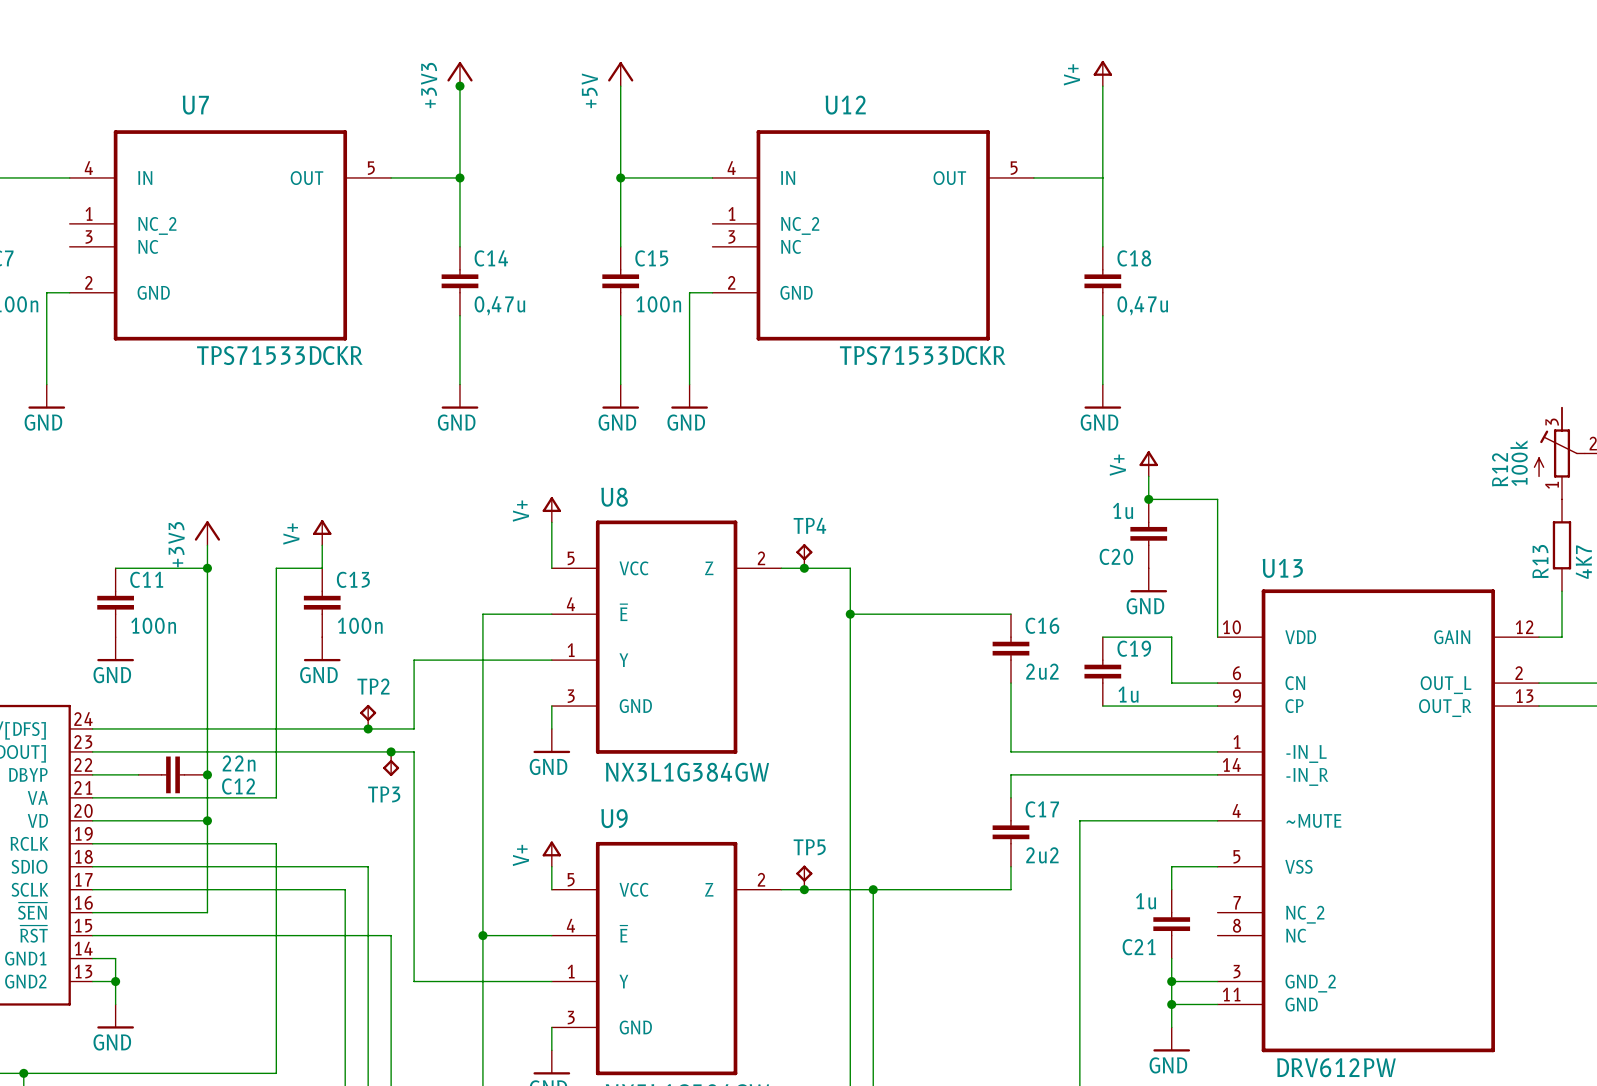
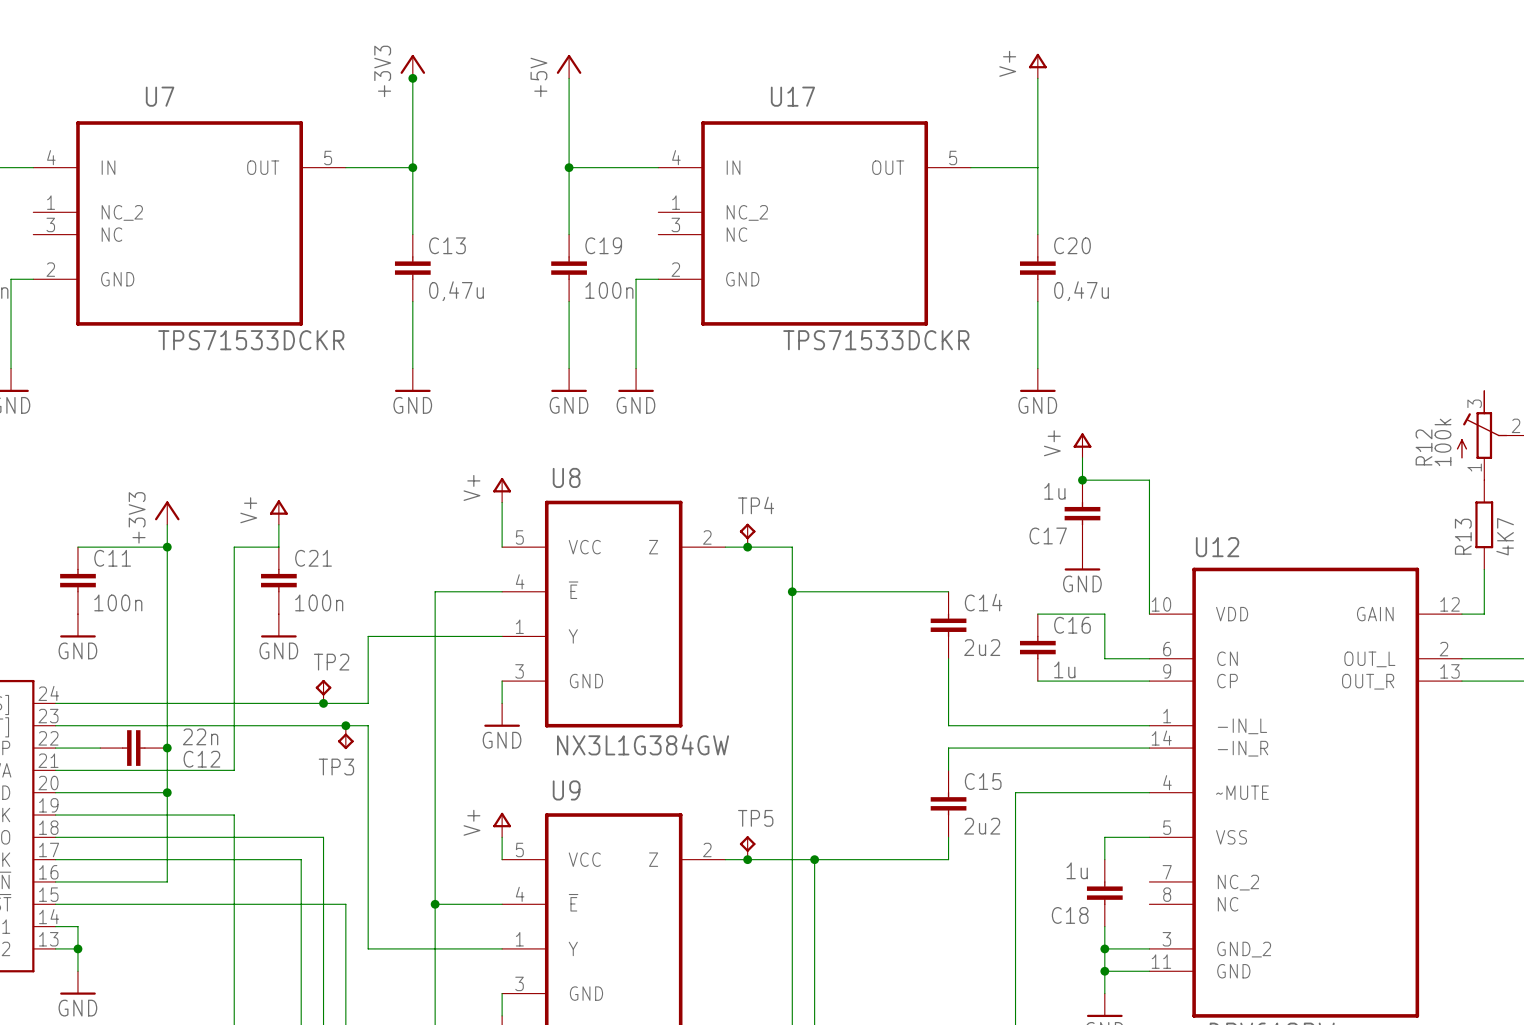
U12 name: U12 (845, 105) -> U17 (792, 96)
C14 name: C14 (491, 258) -> C13 (447, 245)
C15 name: C15 (651, 258) -> C19 (603, 245)
C18 name: C18 (1134, 258) -> C20 (1072, 245)
C20 name: C20 (1116, 556) -> C17 (1048, 535)
U13 name: U13 (1282, 568) -> U12 (1217, 547)
C13 name: C13 (353, 579) -> C21 (313, 558)
C16 name: C16 (1042, 625) -> C14 (983, 602)
C19 name: C19 (1134, 648) -> C16 (1072, 625)
C17 name: C17 (1042, 809) -> C15 (983, 781)
C21 name: C21 (1139, 947) -> C18 (1070, 915)

